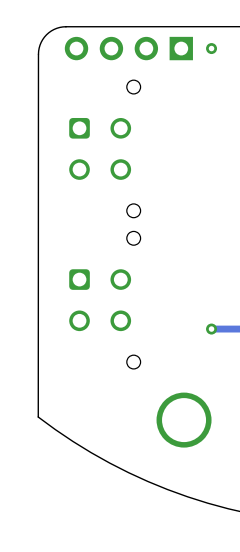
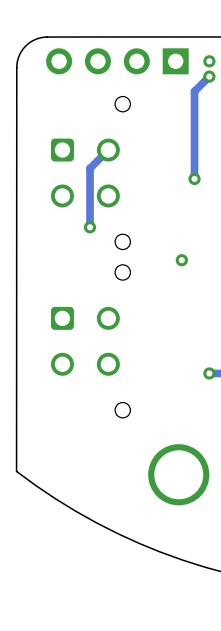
track: none -> (209, 76) (194, 91) (194, 178)
via: none -> (209, 76)
track: none -> (108, 150) (90, 168) (90, 227)
via: none -> (194, 178)
via: none -> (90, 227)
via: none -> (181, 260)

